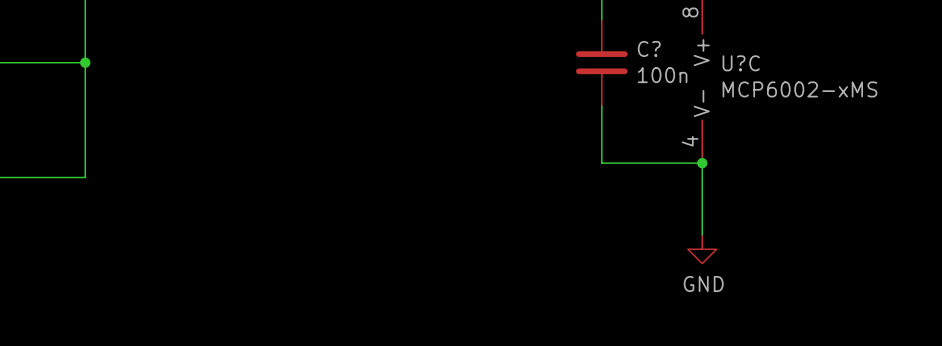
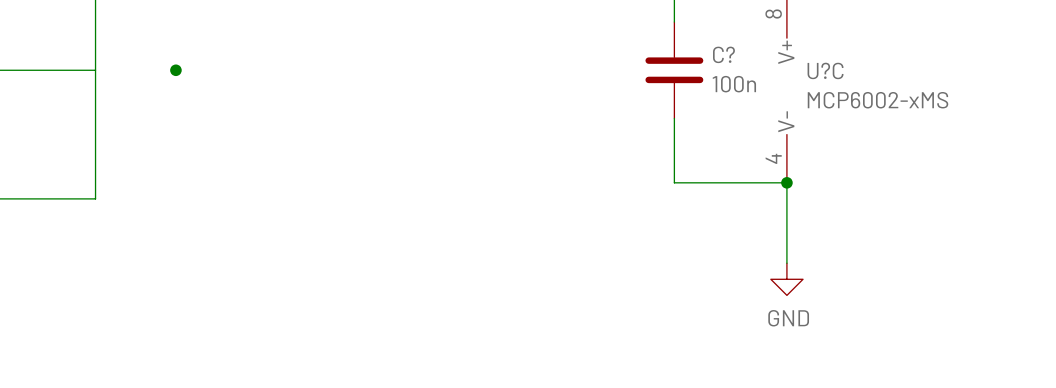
junction: (85, 62) -> none
junction: none -> (175, 70)

